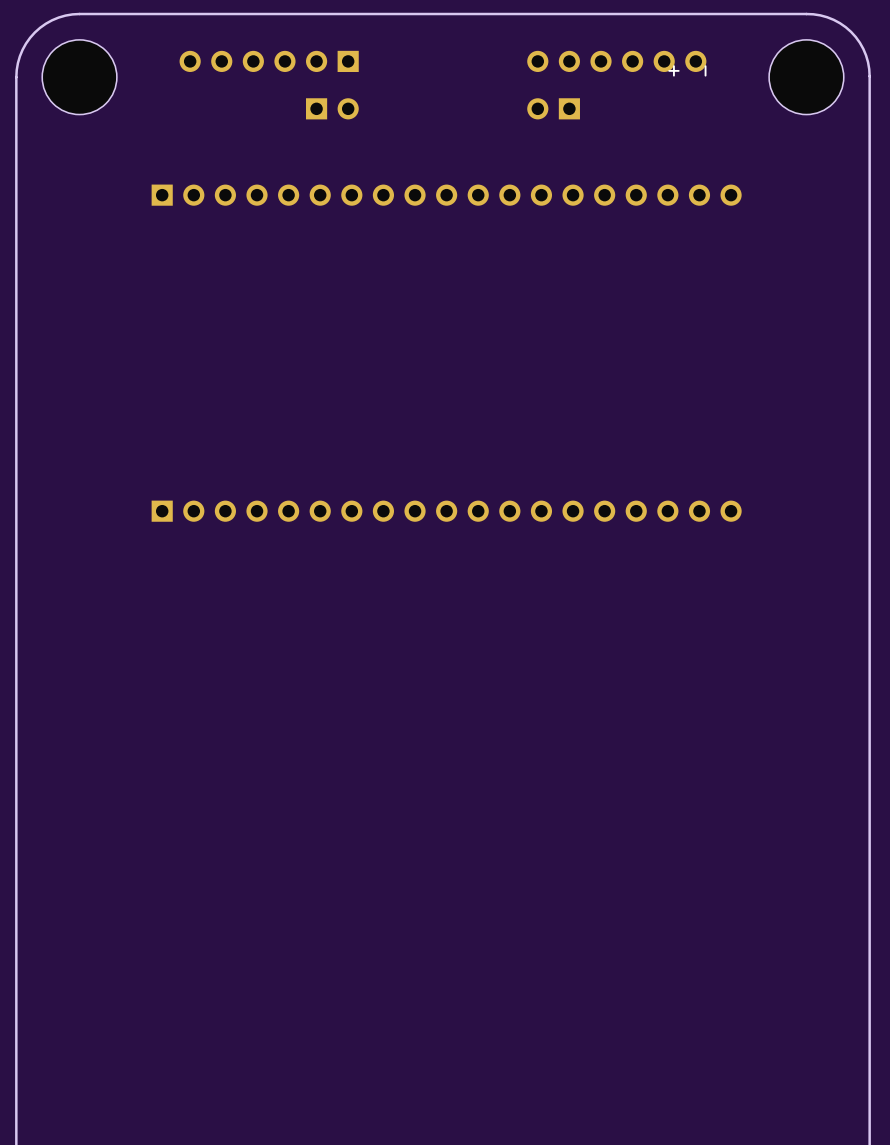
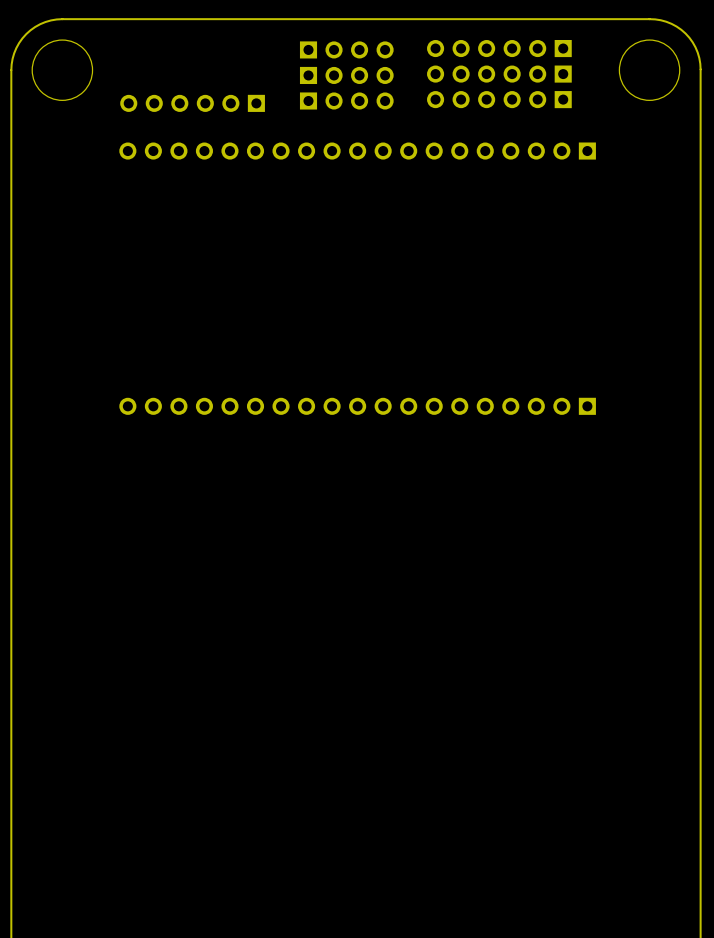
part: none -> (499, 48)
part: none -> (346, 49)
part position: (269, 61) -> (192, 103)
part: (616, 61) -> none
part: none -> (499, 74)
part: none -> (346, 75)
part: (332, 108) -> none
part: (553, 108) -> none
part: none -> (499, 99)
part: none -> (346, 100)
part rotation: 0° (446, 195) -> 180° (357, 151)
part rotation: 0° (446, 511) -> 180° (357, 406)

